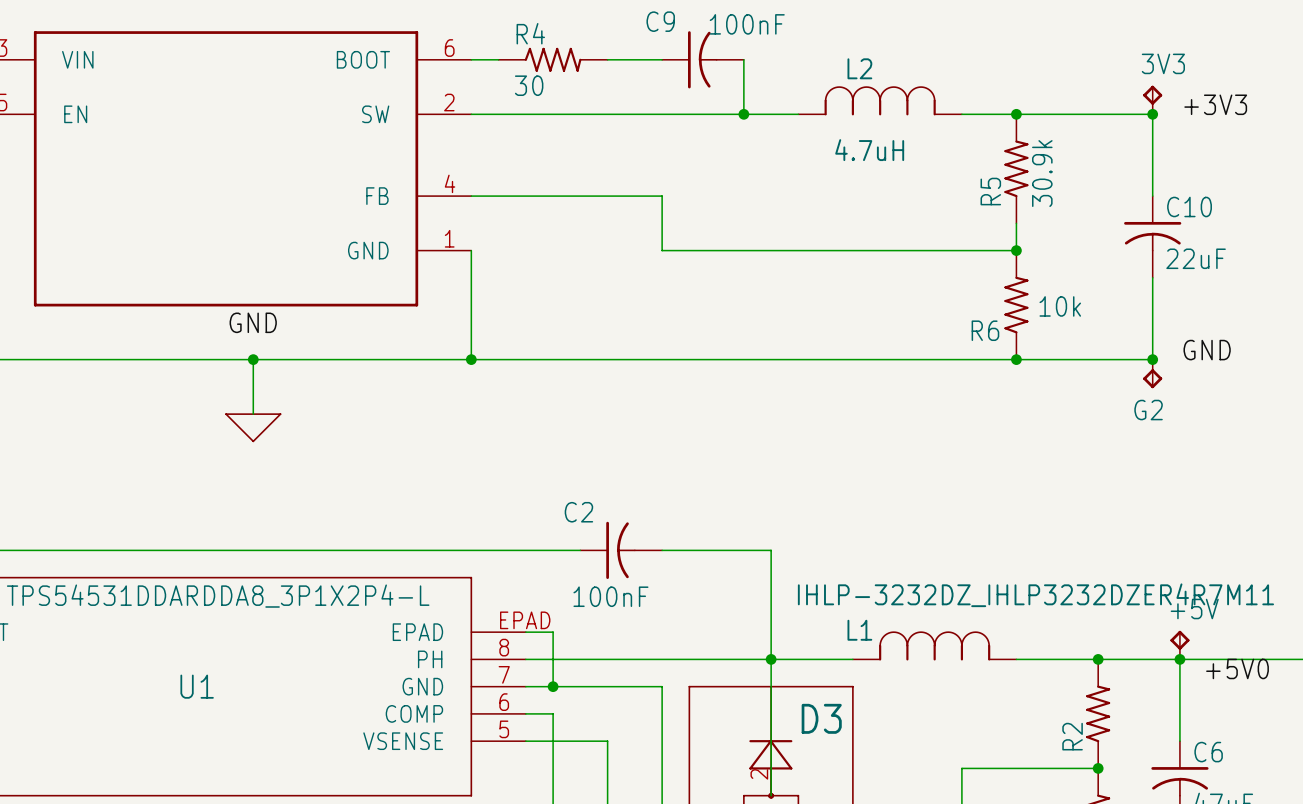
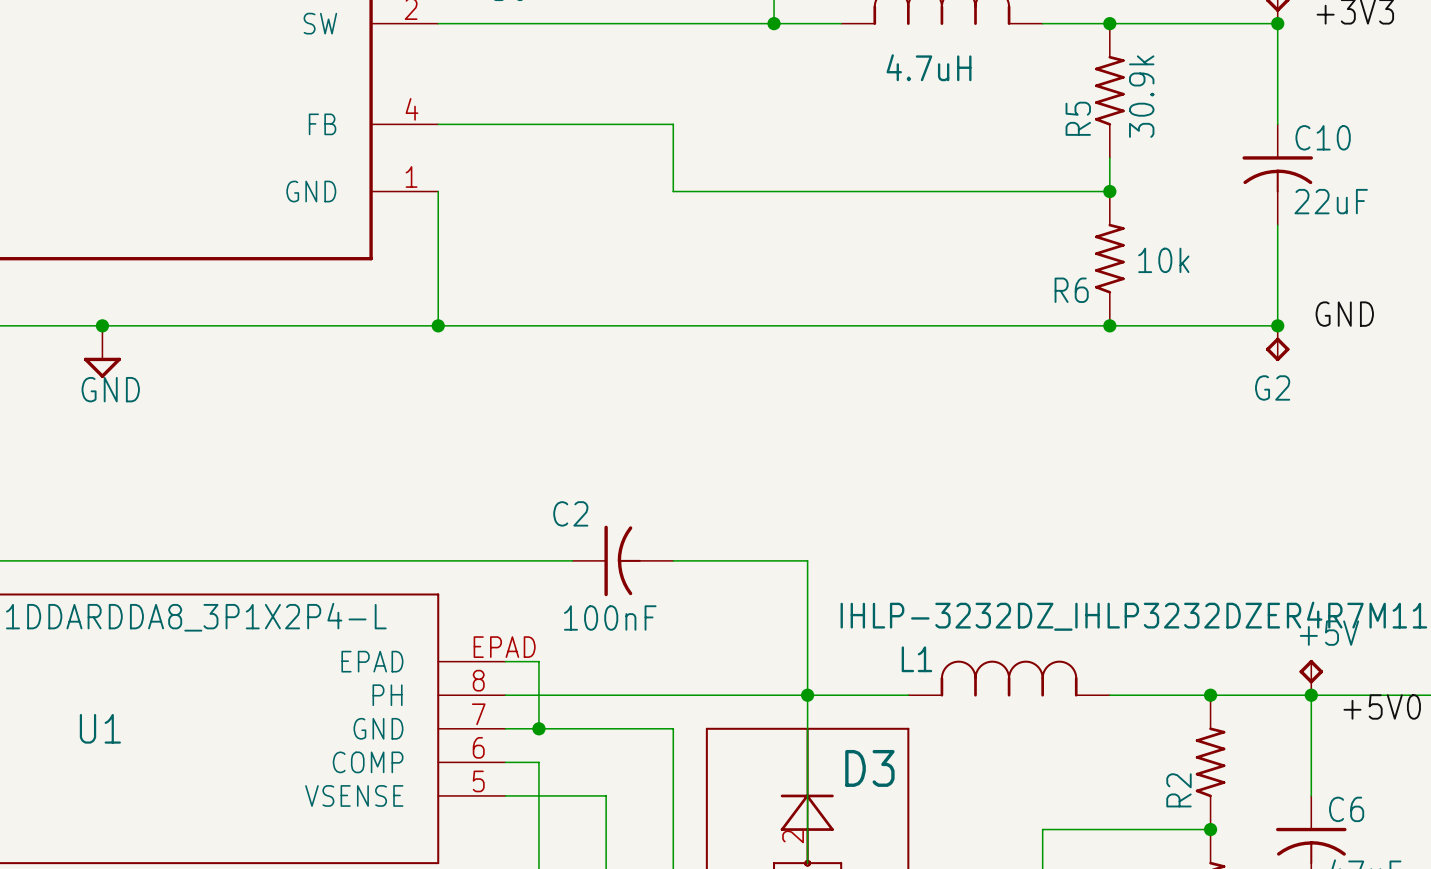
label: GND (253, 322) -> none
wire: (253, 359) (253, 414) -> none
junction position: (253, 359) -> (102, 325)
power symbol: none -> GND (102, 351)
power symbol: (253, 427) -> none

